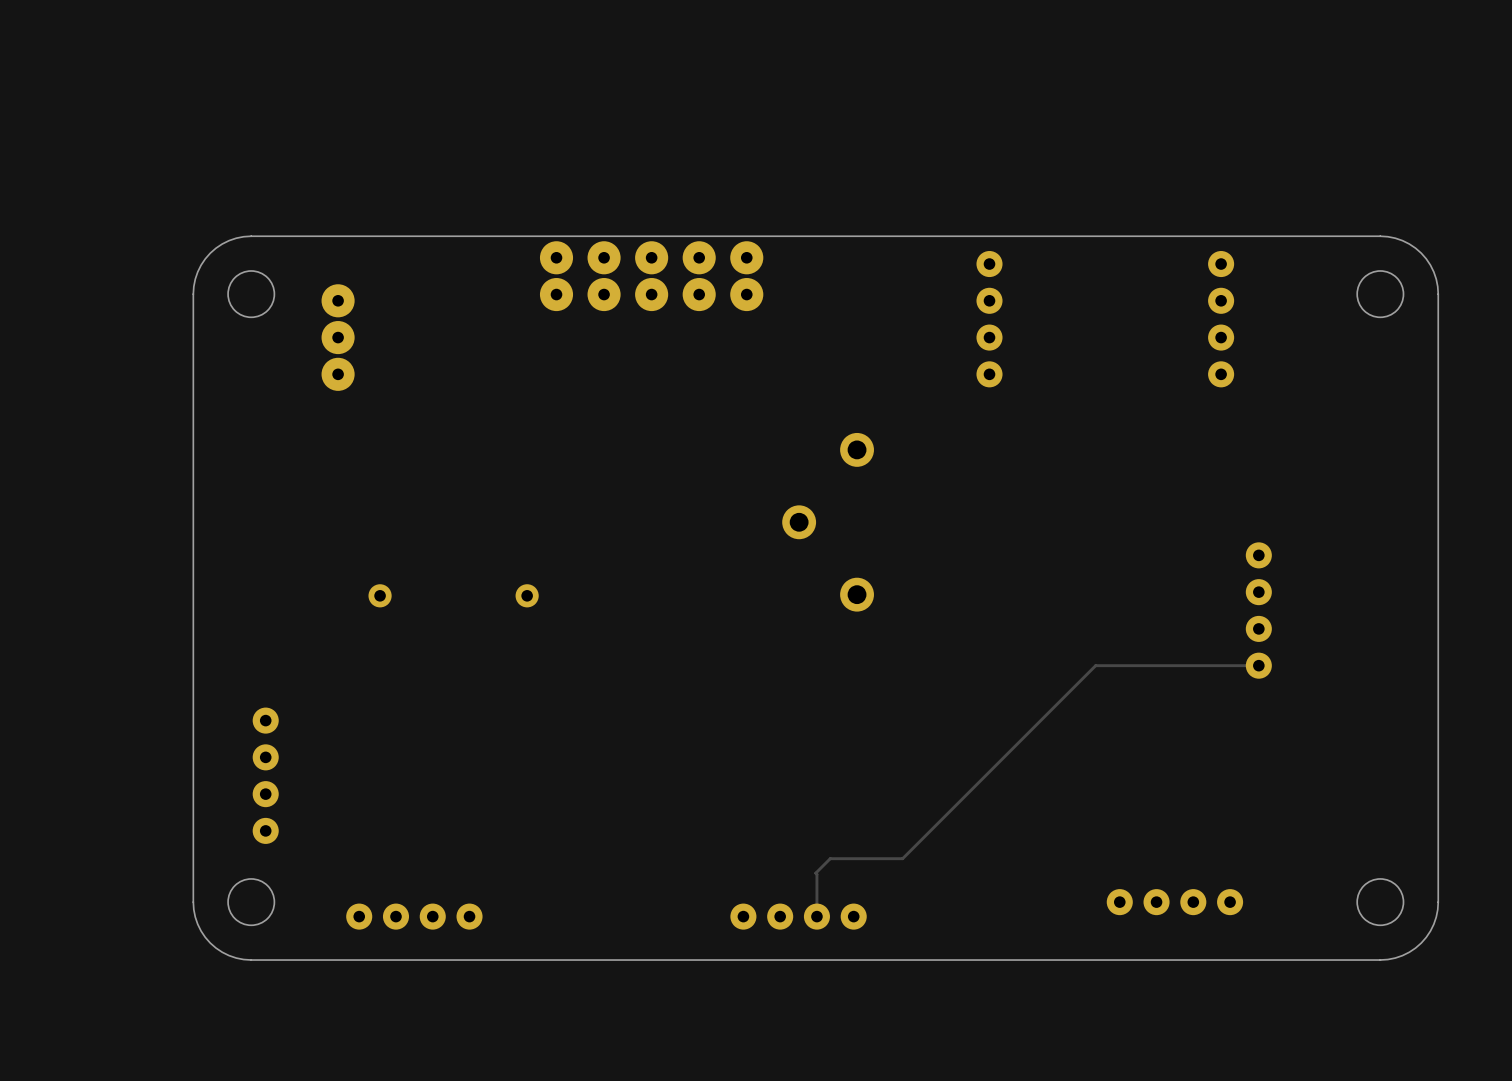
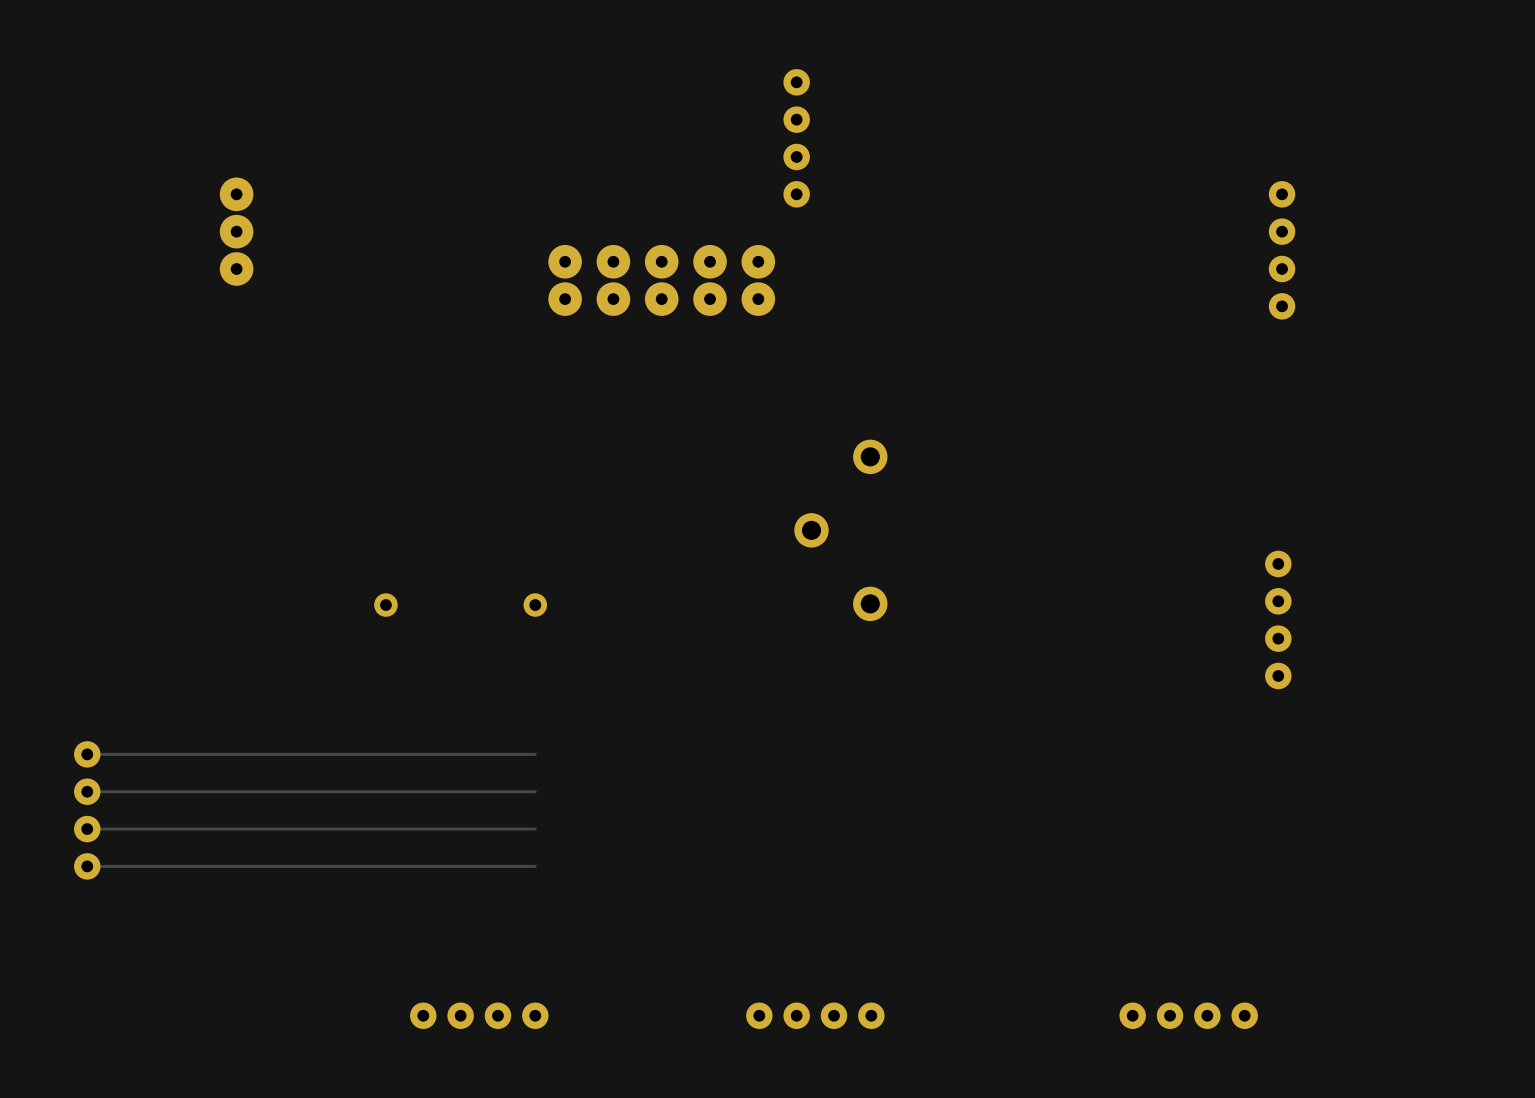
part: none -> (796, 138)
board edge: (1380, 236) (251, 236) (236, 238) (222, 243) (210, 253) (201, 265) (195, 279) (193, 294) (193, 902) (195, 917) (201, 931) (210, 943) (222, 952) (236, 958) (251, 960) (1380, 960) (1395, 958) (1409, 952) (1421, 943) (1430, 931) (1436, 917) (1438, 902) (1438, 294) (1433, 271) (1421, 253) (1402, 240) (1380, 236) -> none
round board edge: [227, 270, 275, 318] -> none
round board edge: [1356, 270, 1404, 318] -> none
part: (989, 319) -> none
part position: (1221, 319) -> (1282, 250)
part position: (338, 337) -> (236, 231)
track: (1258, 665) (1095, 665) (902, 858) (830, 858) (815, 873) (816, 916) -> none
track: none -> (535, 754) (87, 754)
part: (265, 775) -> none
track: none -> (535, 791) (87, 791)
part: none -> (87, 810)
track: none -> (535, 829) (87, 829)
track: none -> (535, 866) (87, 866)
round board edge: [227, 878, 275, 926] -> none
round board edge: [1356, 878, 1404, 926] -> none
part position: (1174, 902) -> (1188, 1015)
part position: (414, 916) -> (479, 1015)
part position: (798, 916) -> (815, 1015)

